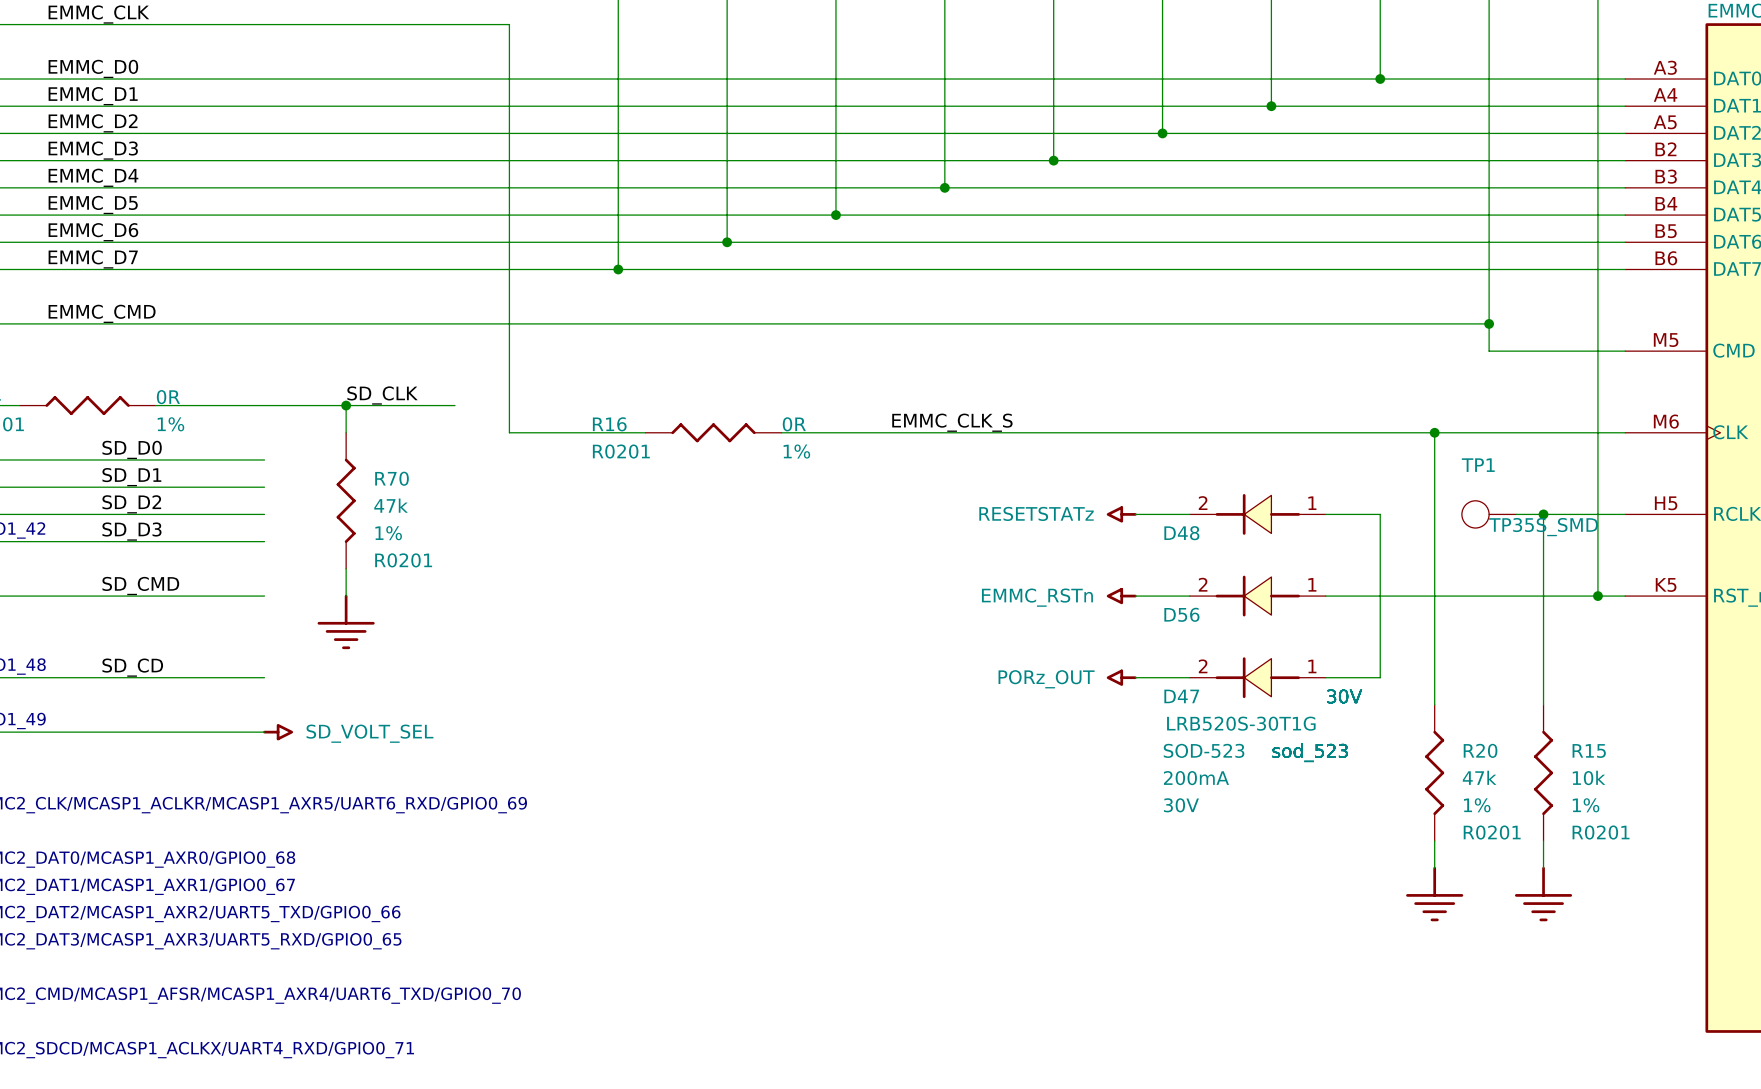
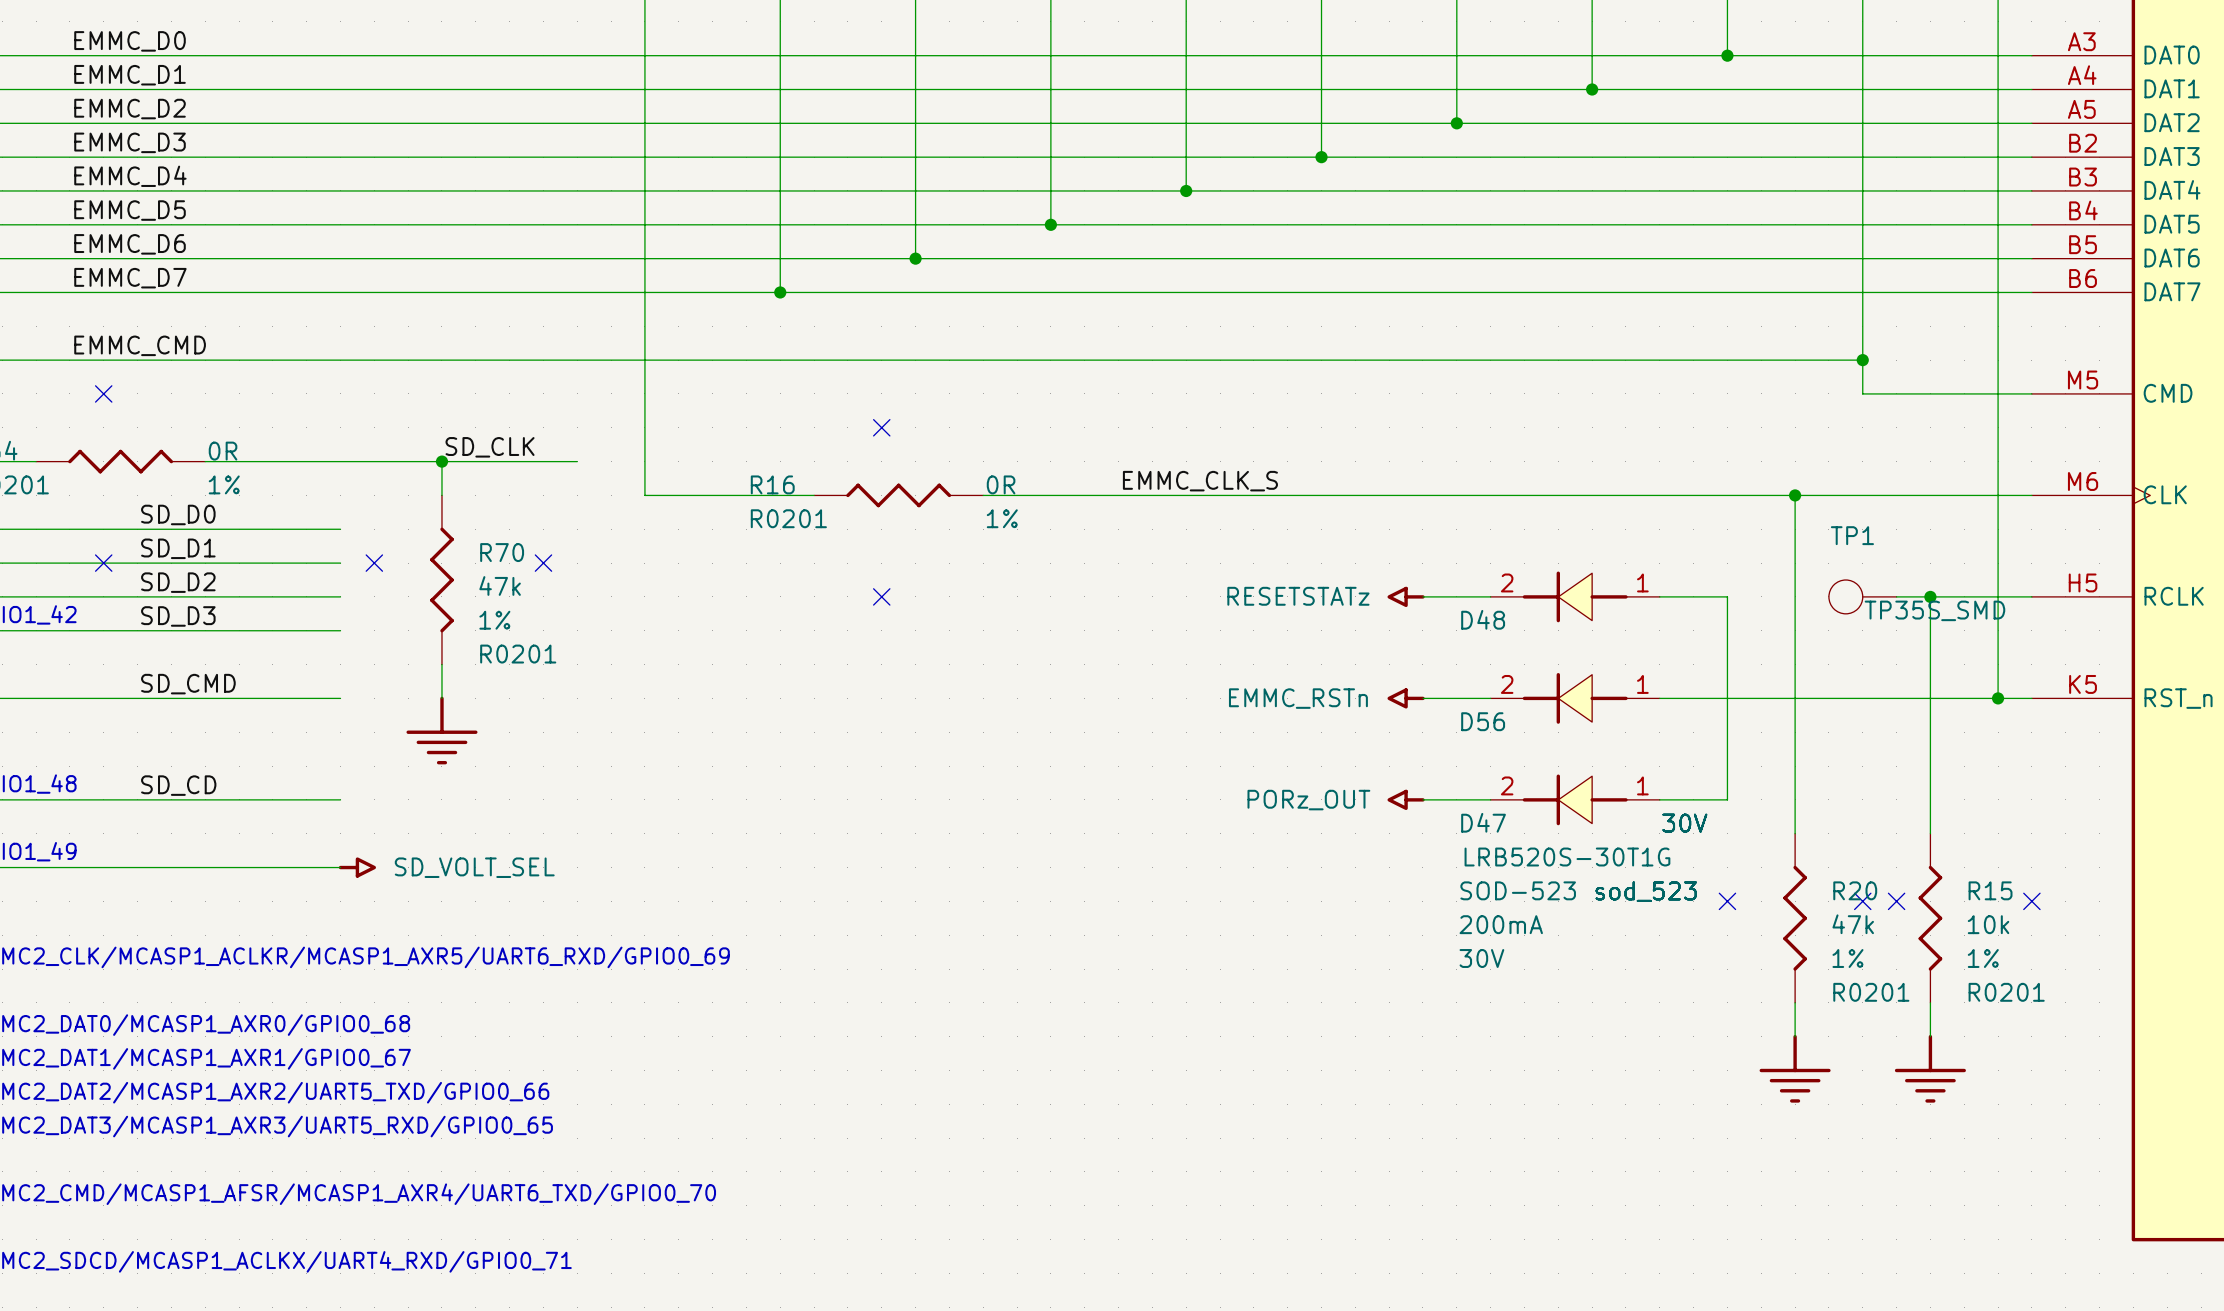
no-connect mark: none -> (103, 393)
no-connect mark: none -> (881, 427)
no-connect mark: none -> (103, 563)
no-connect mark: none -> (374, 563)
no-connect mark: none -> (543, 563)
no-connect mark: none -> (881, 596)
no-connect mark: none -> (1727, 901)
no-connect mark: none -> (1862, 901)
no-connect mark: none -> (1896, 901)
no-connect mark: none -> (2031, 901)

